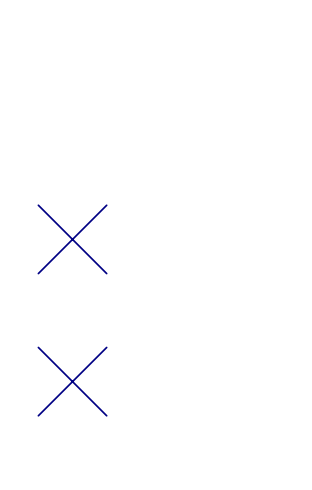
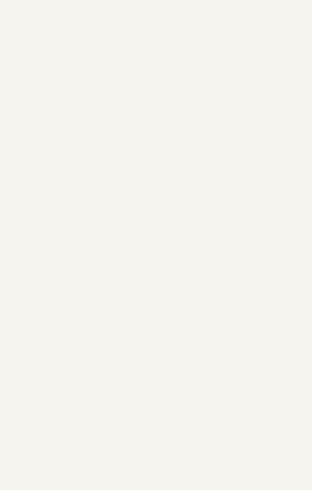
no-connect mark: (72, 239) -> none
no-connect mark: (72, 381) -> none

